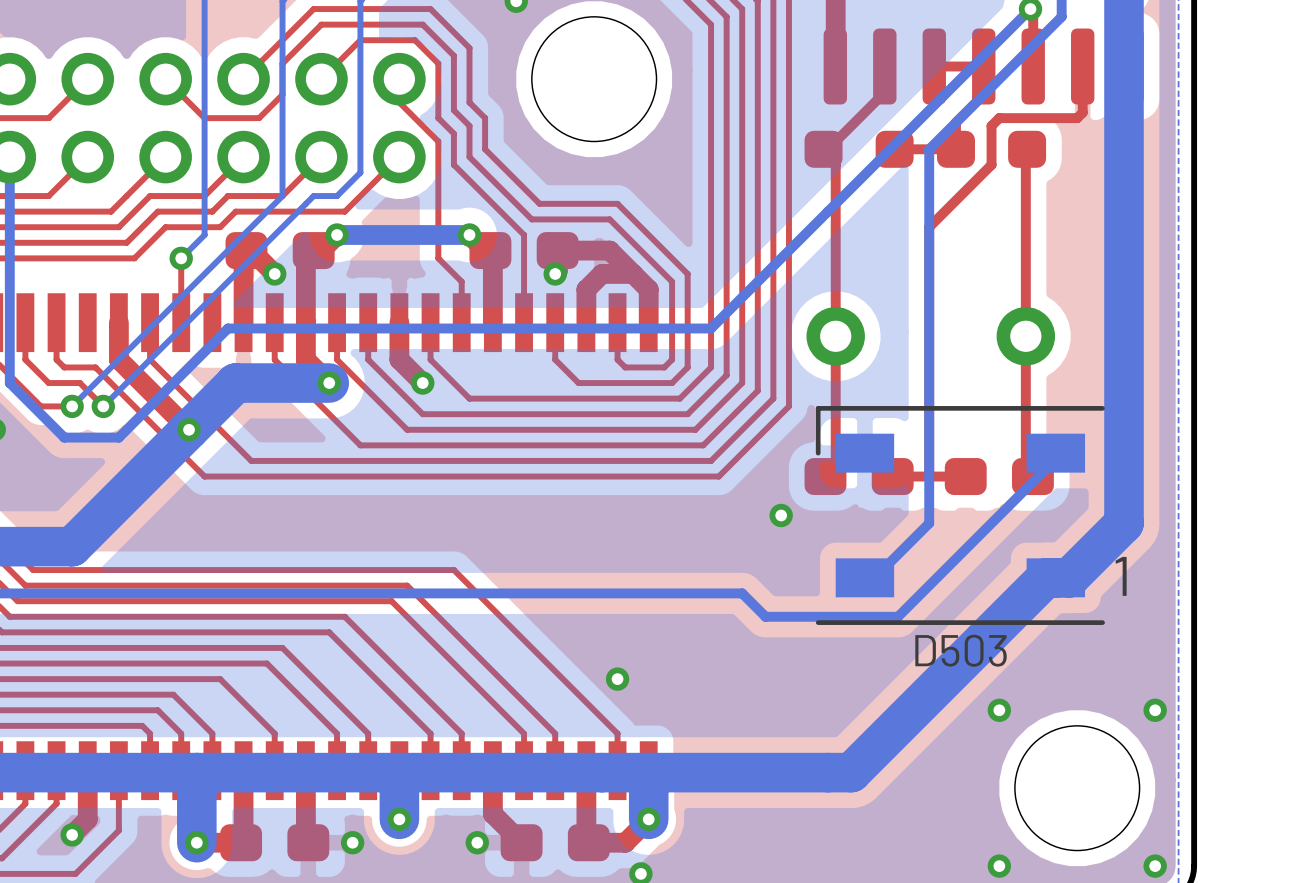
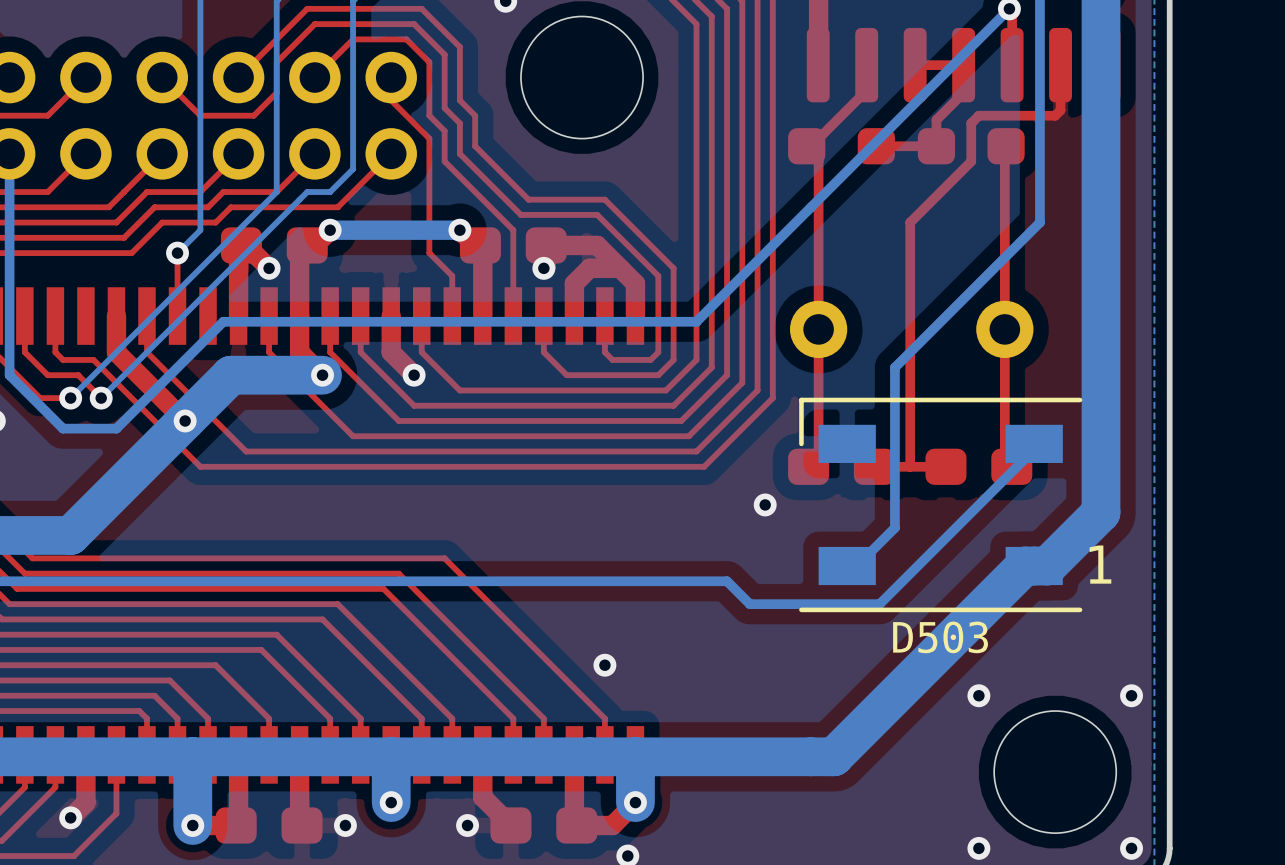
bottom track: (1061, 16) (929, 149) (929, 523) (913, 538) -> (1039, 16) (1039, 222) (894, 367) (894, 527)

